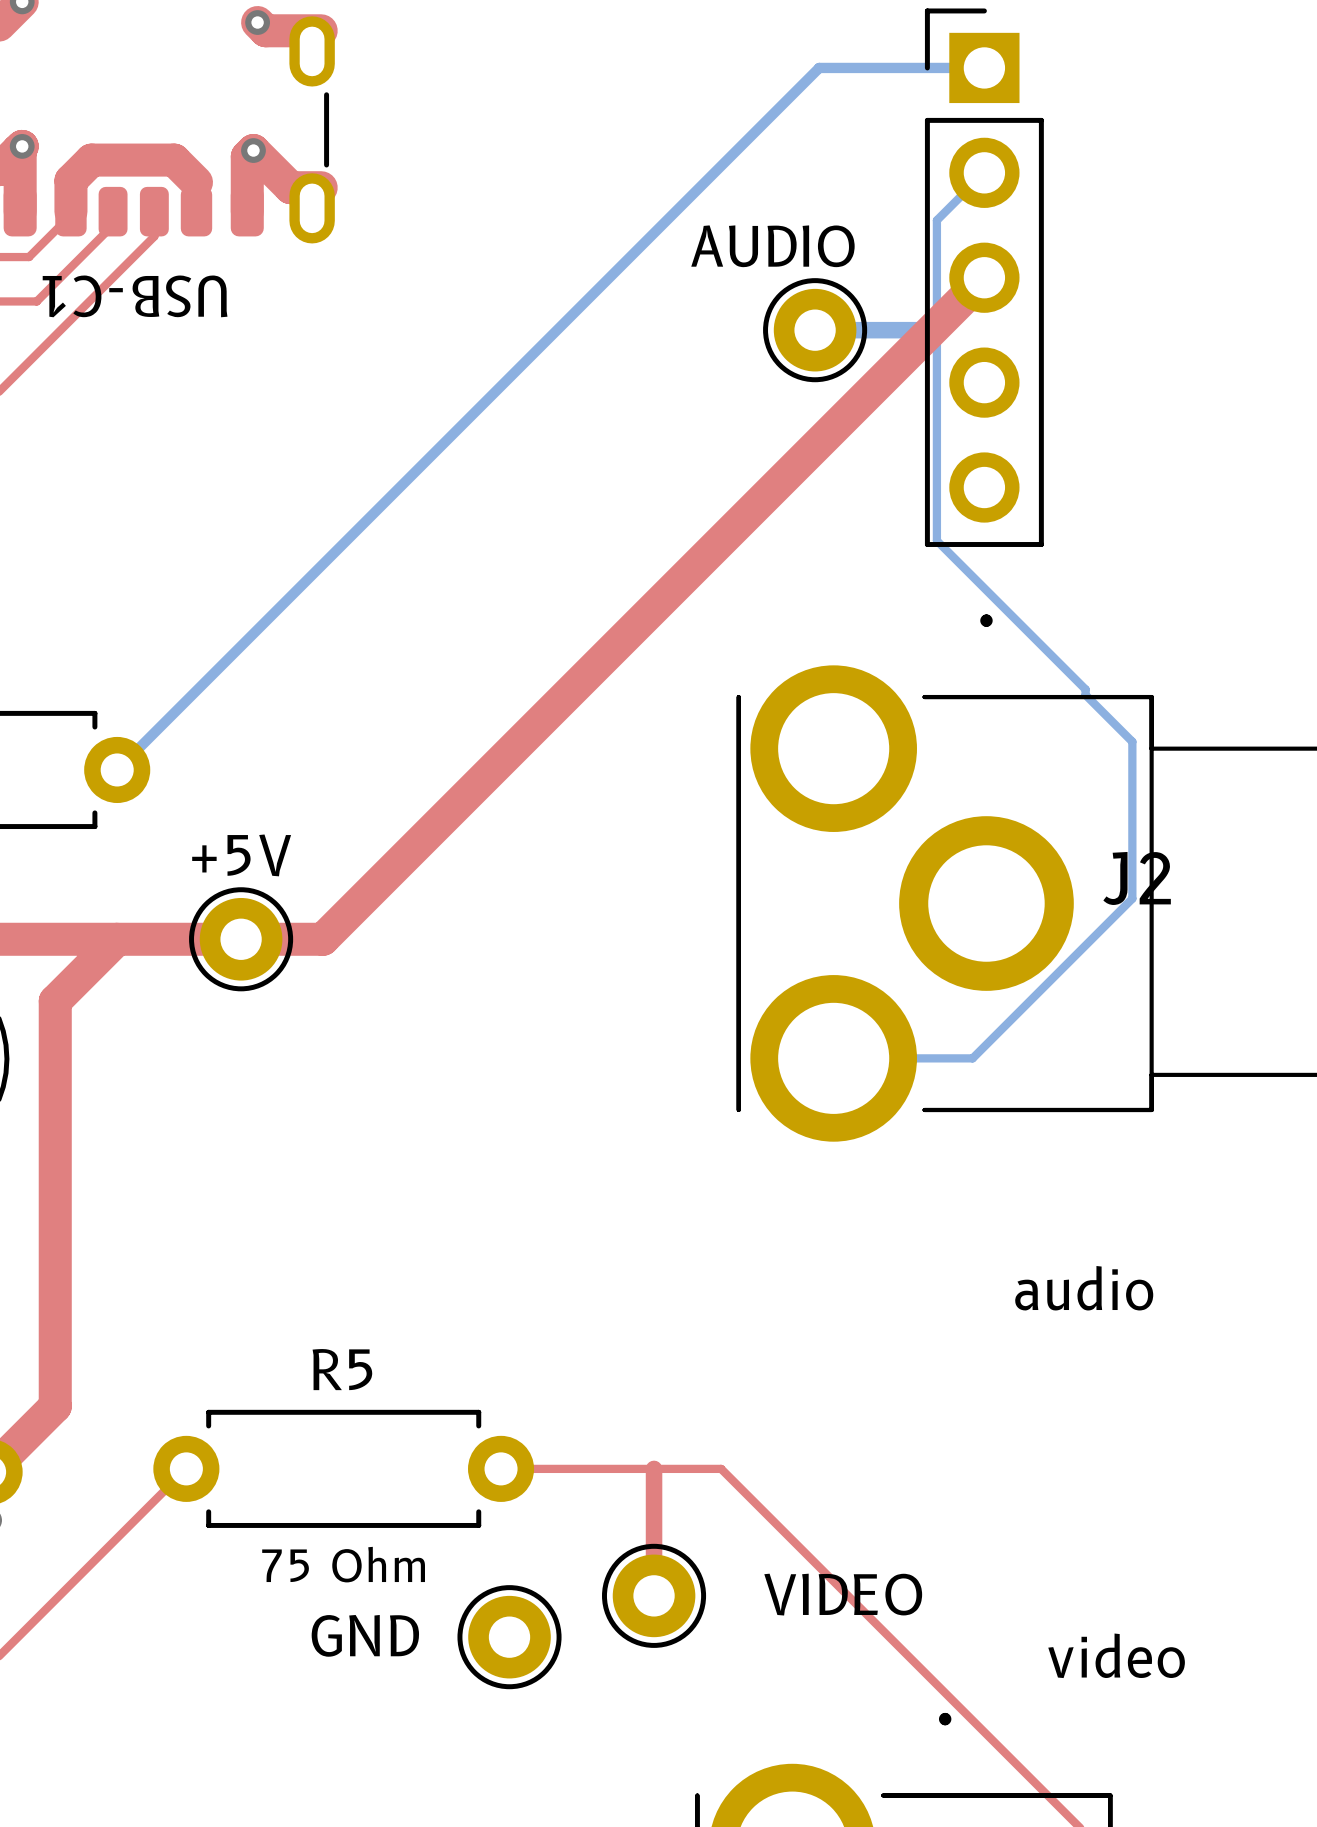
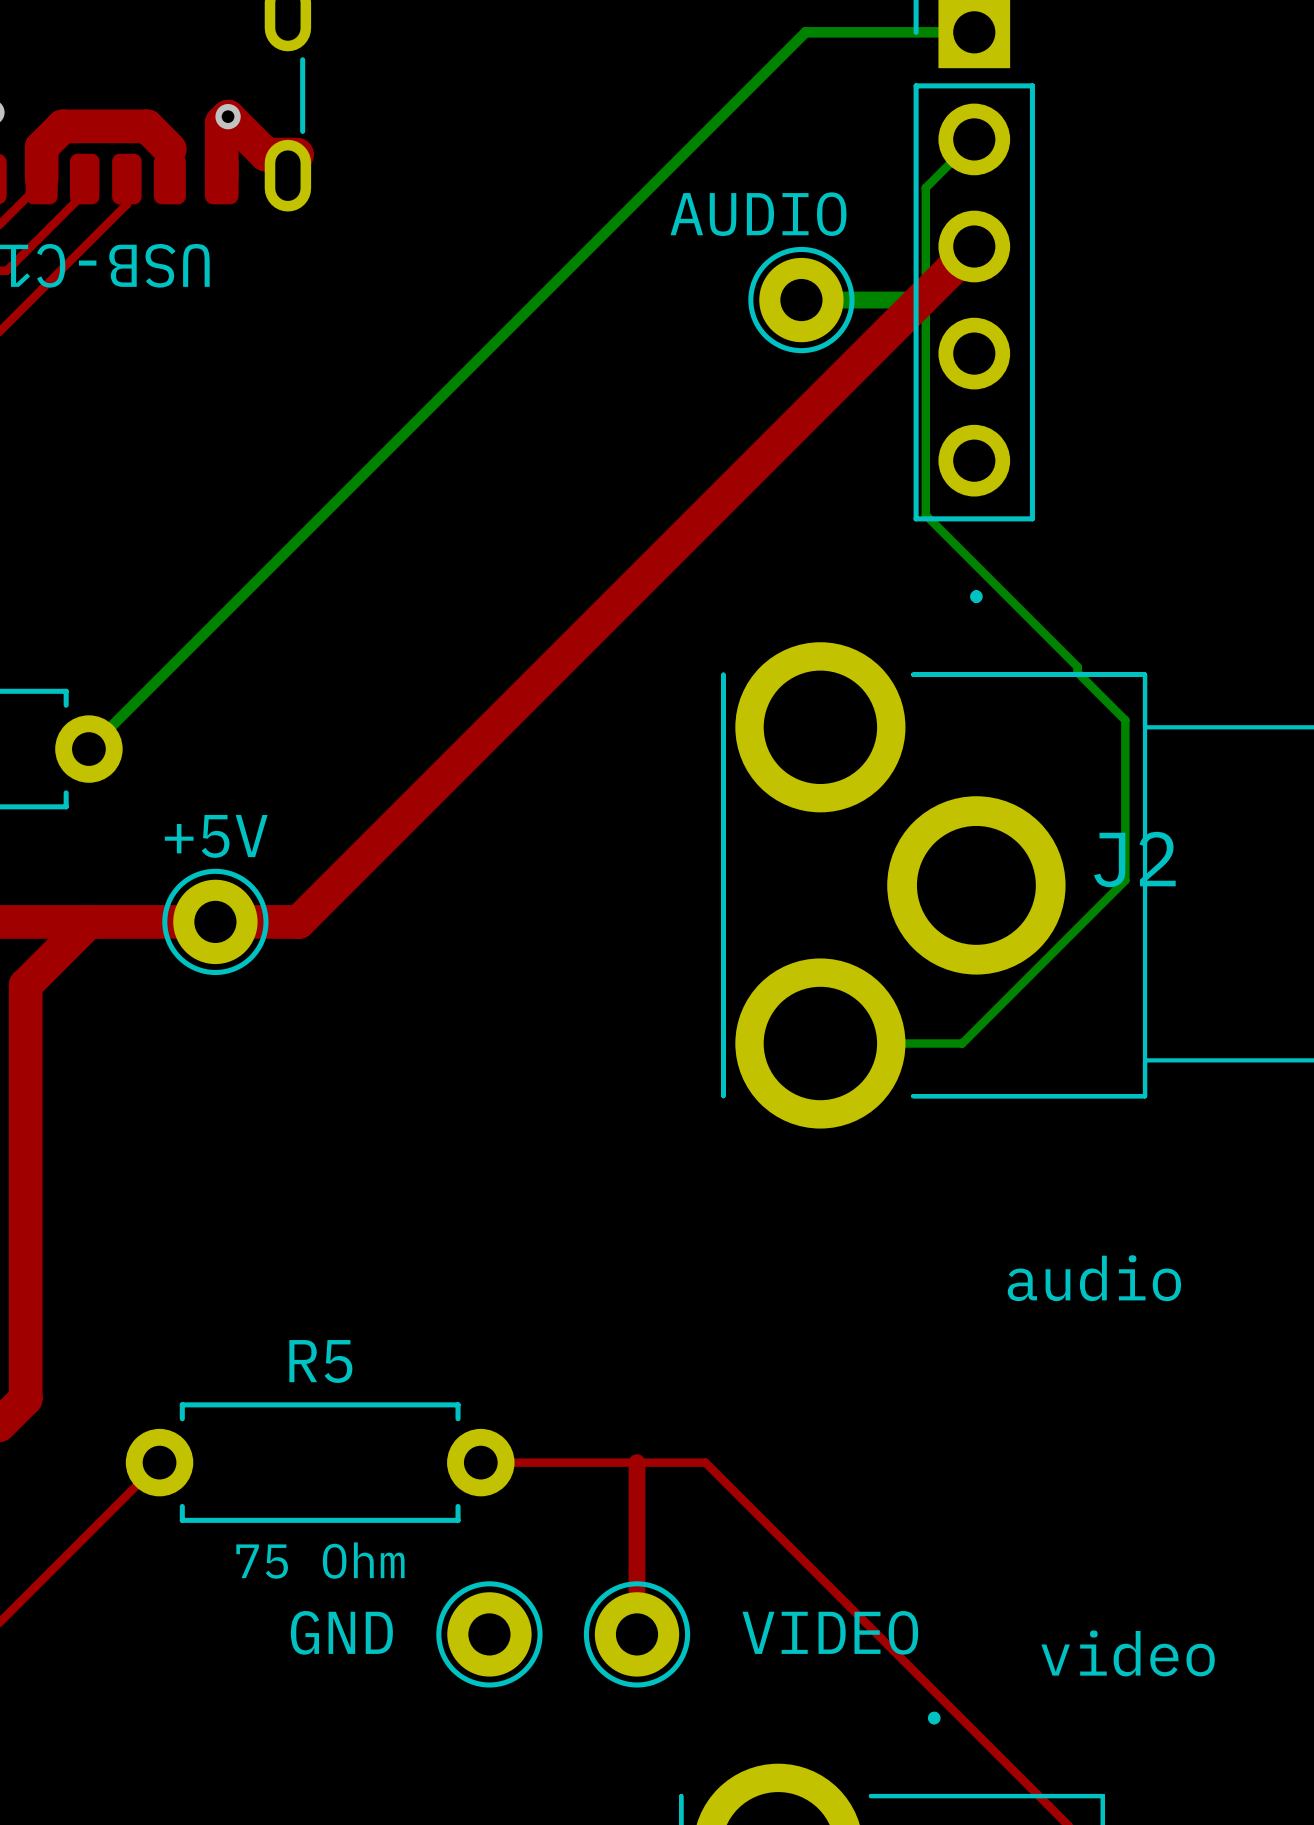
part position: (654, 1595) -> (637, 1634)

